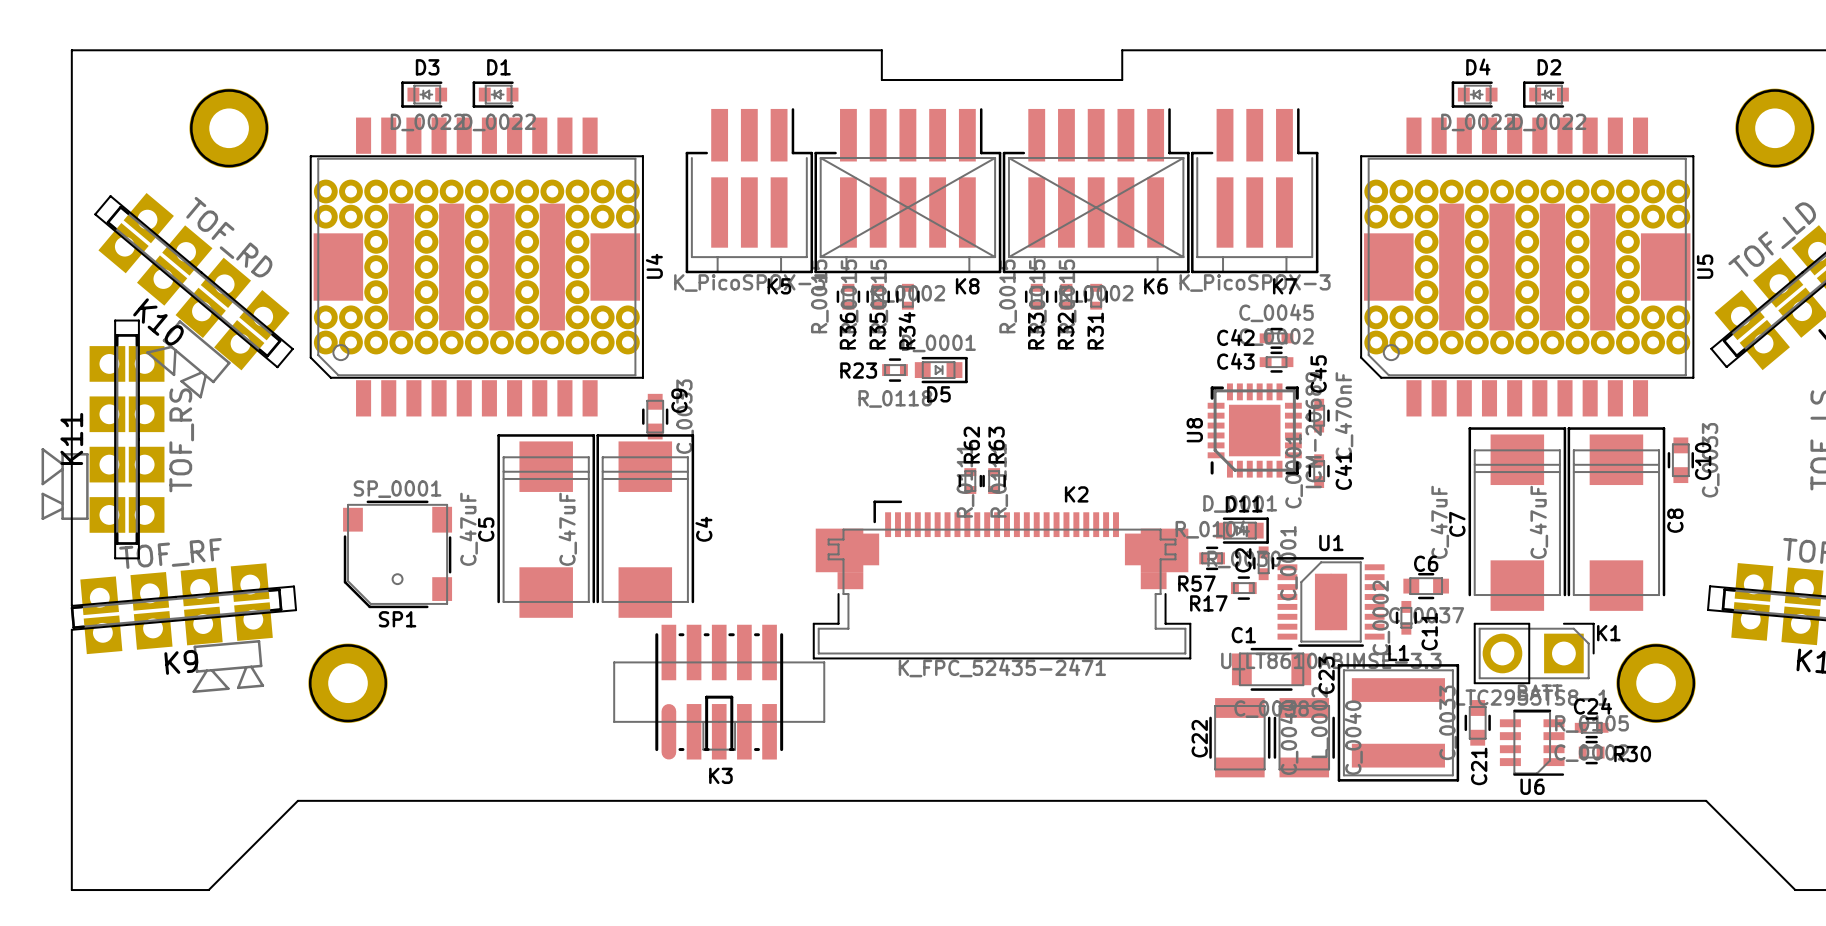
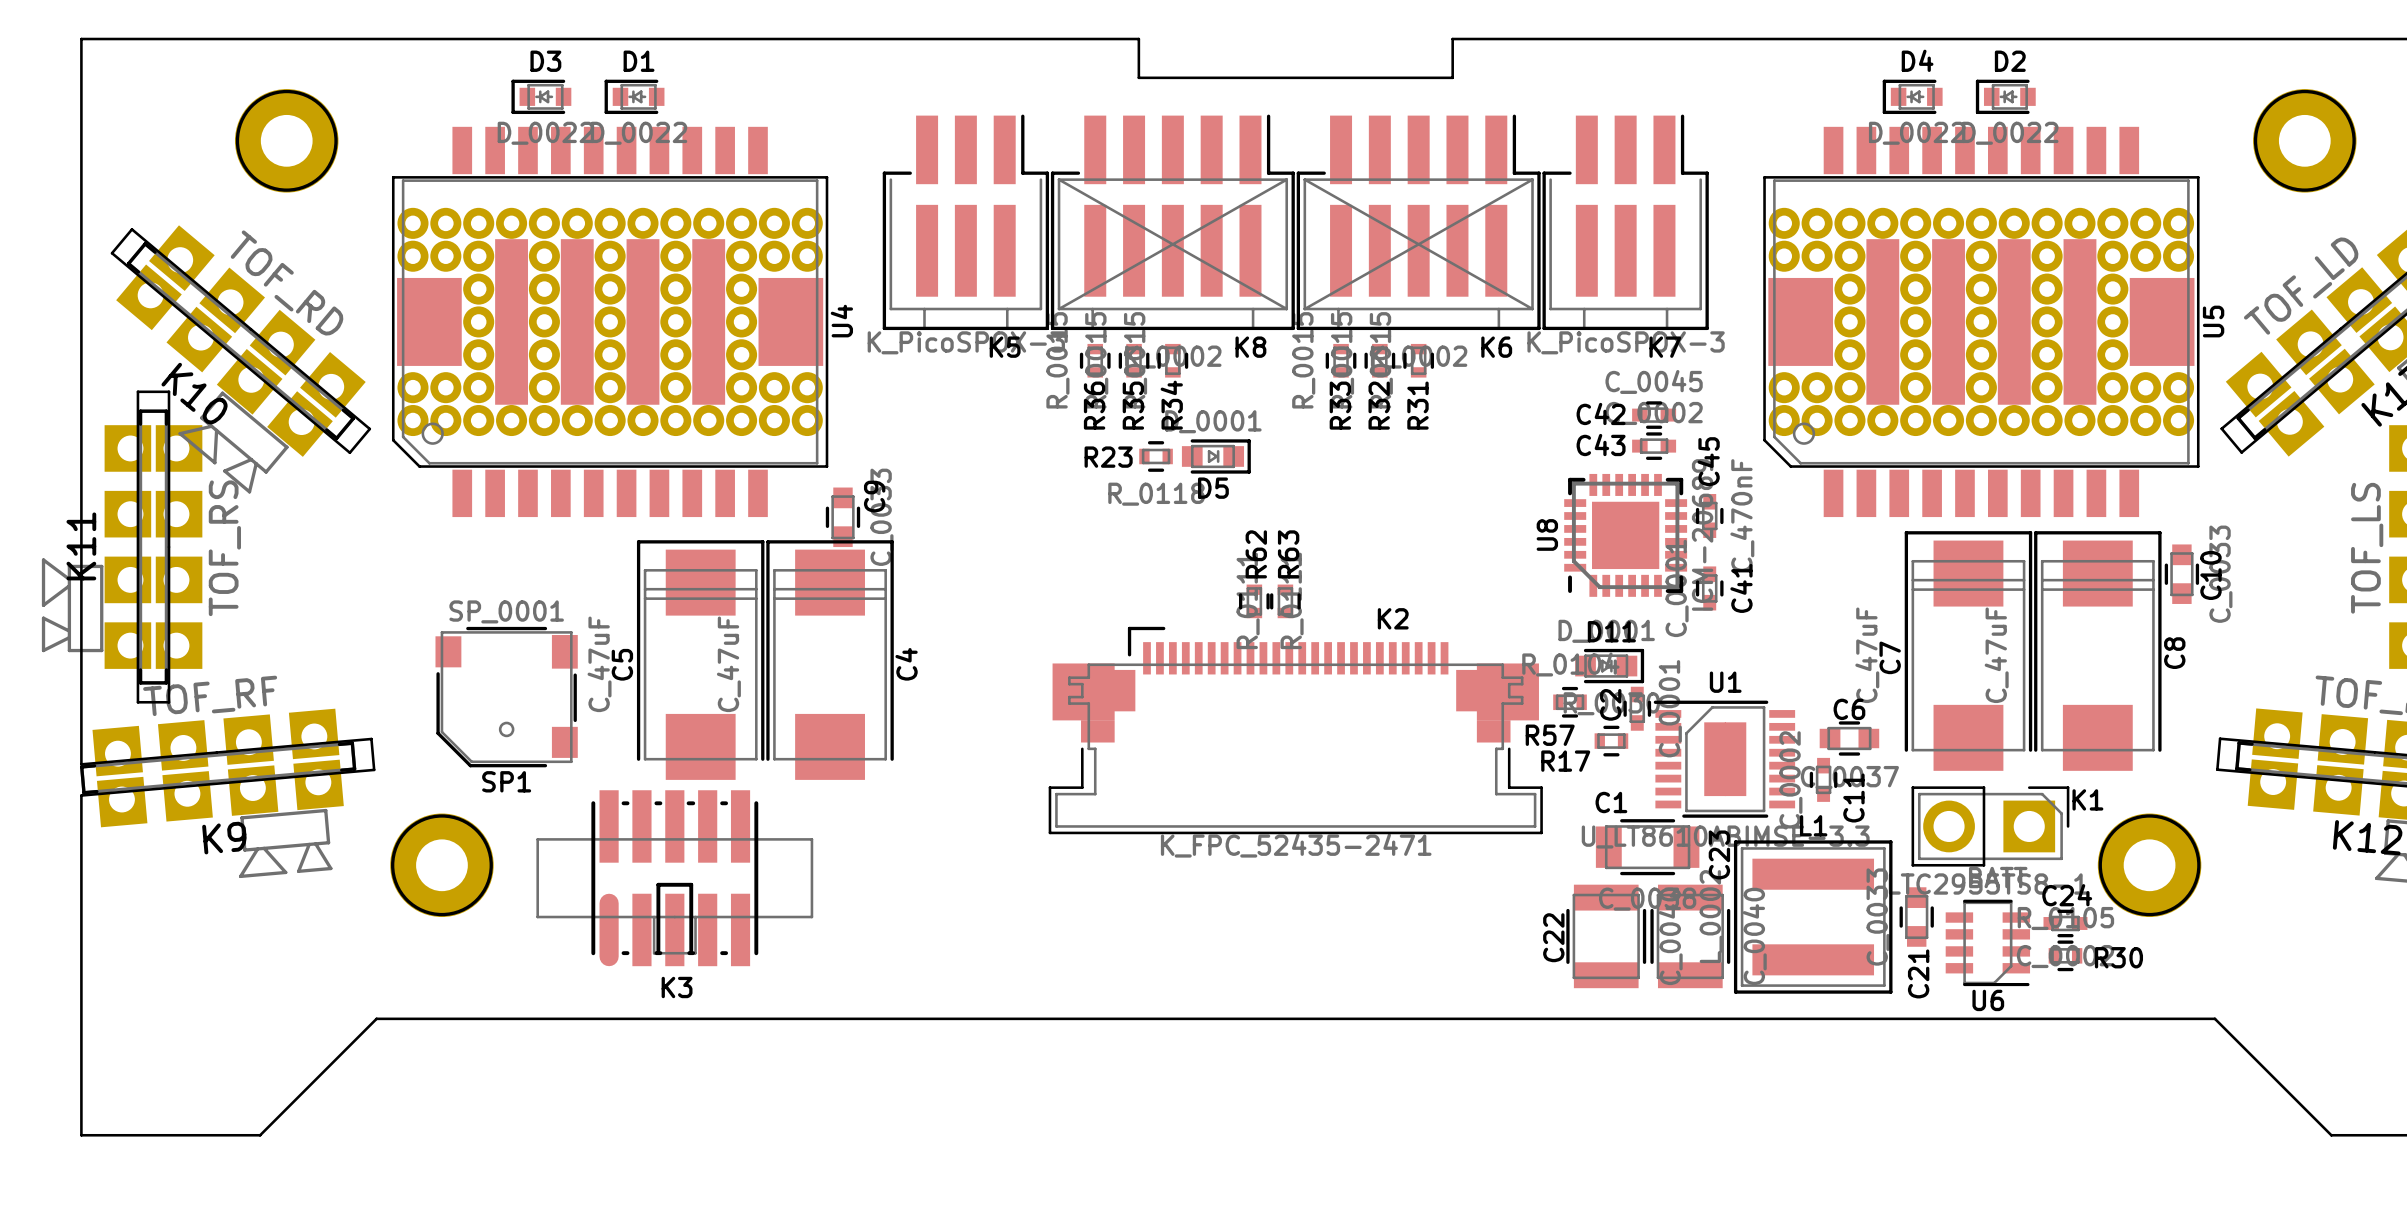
K3 position: (719, 692) -> (674, 878)

